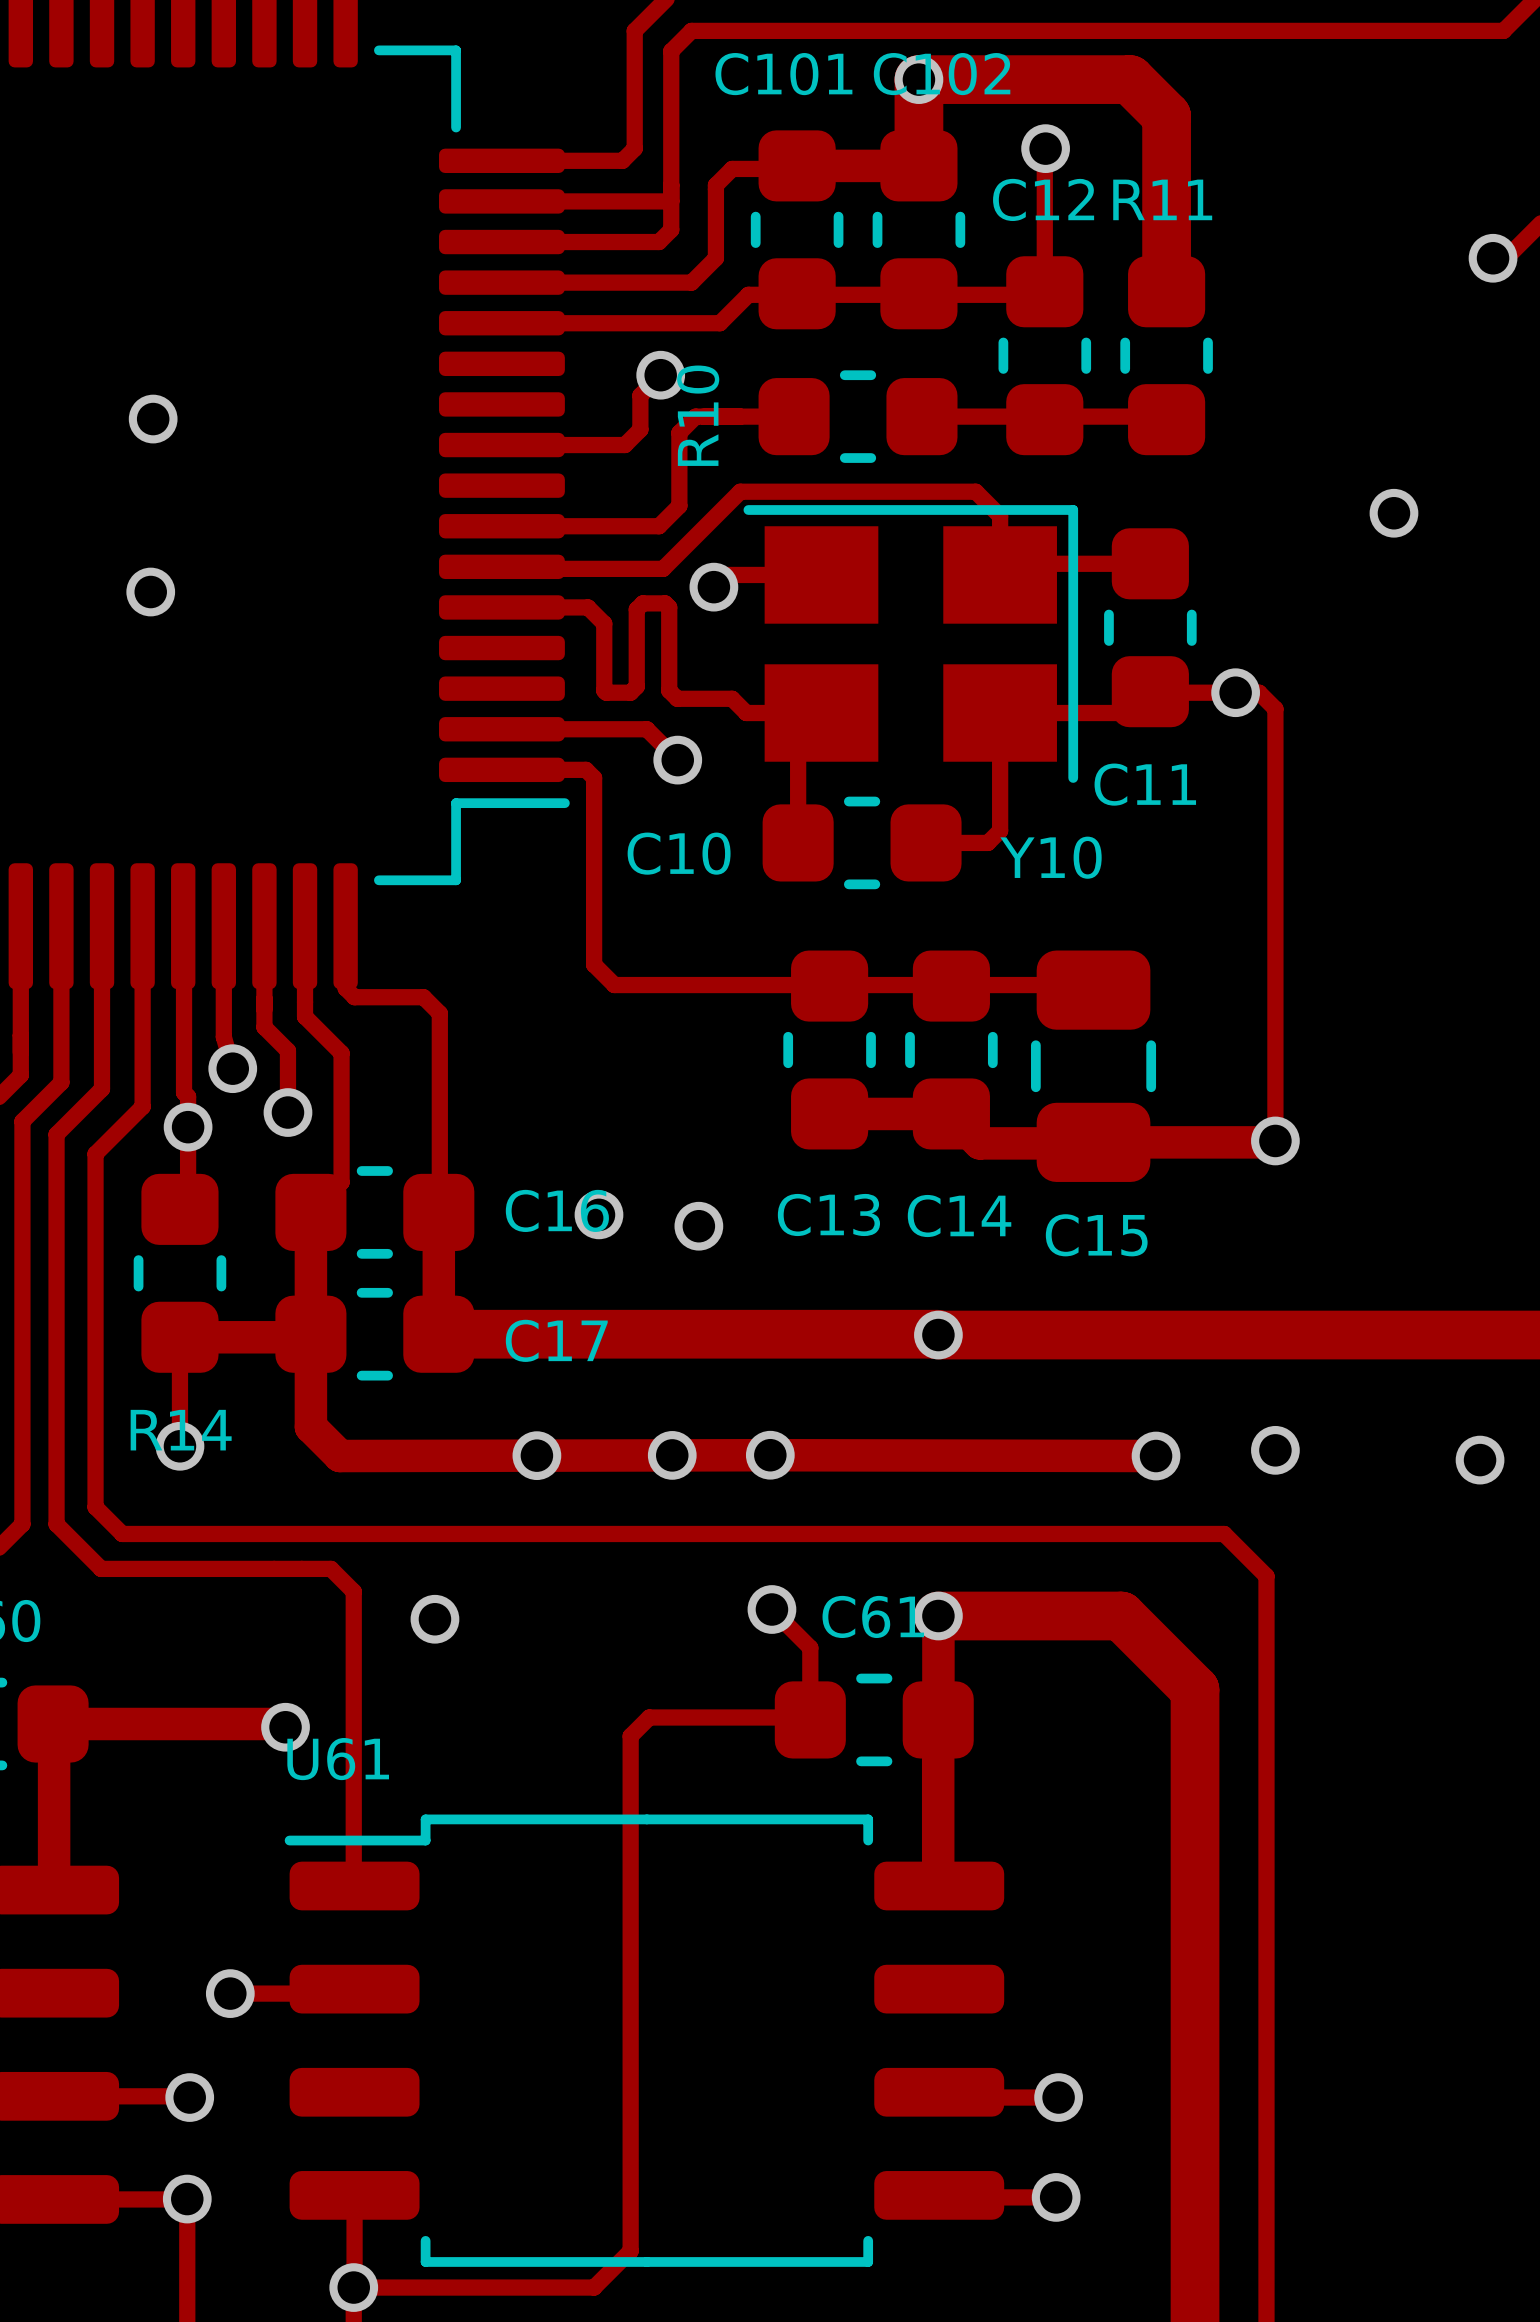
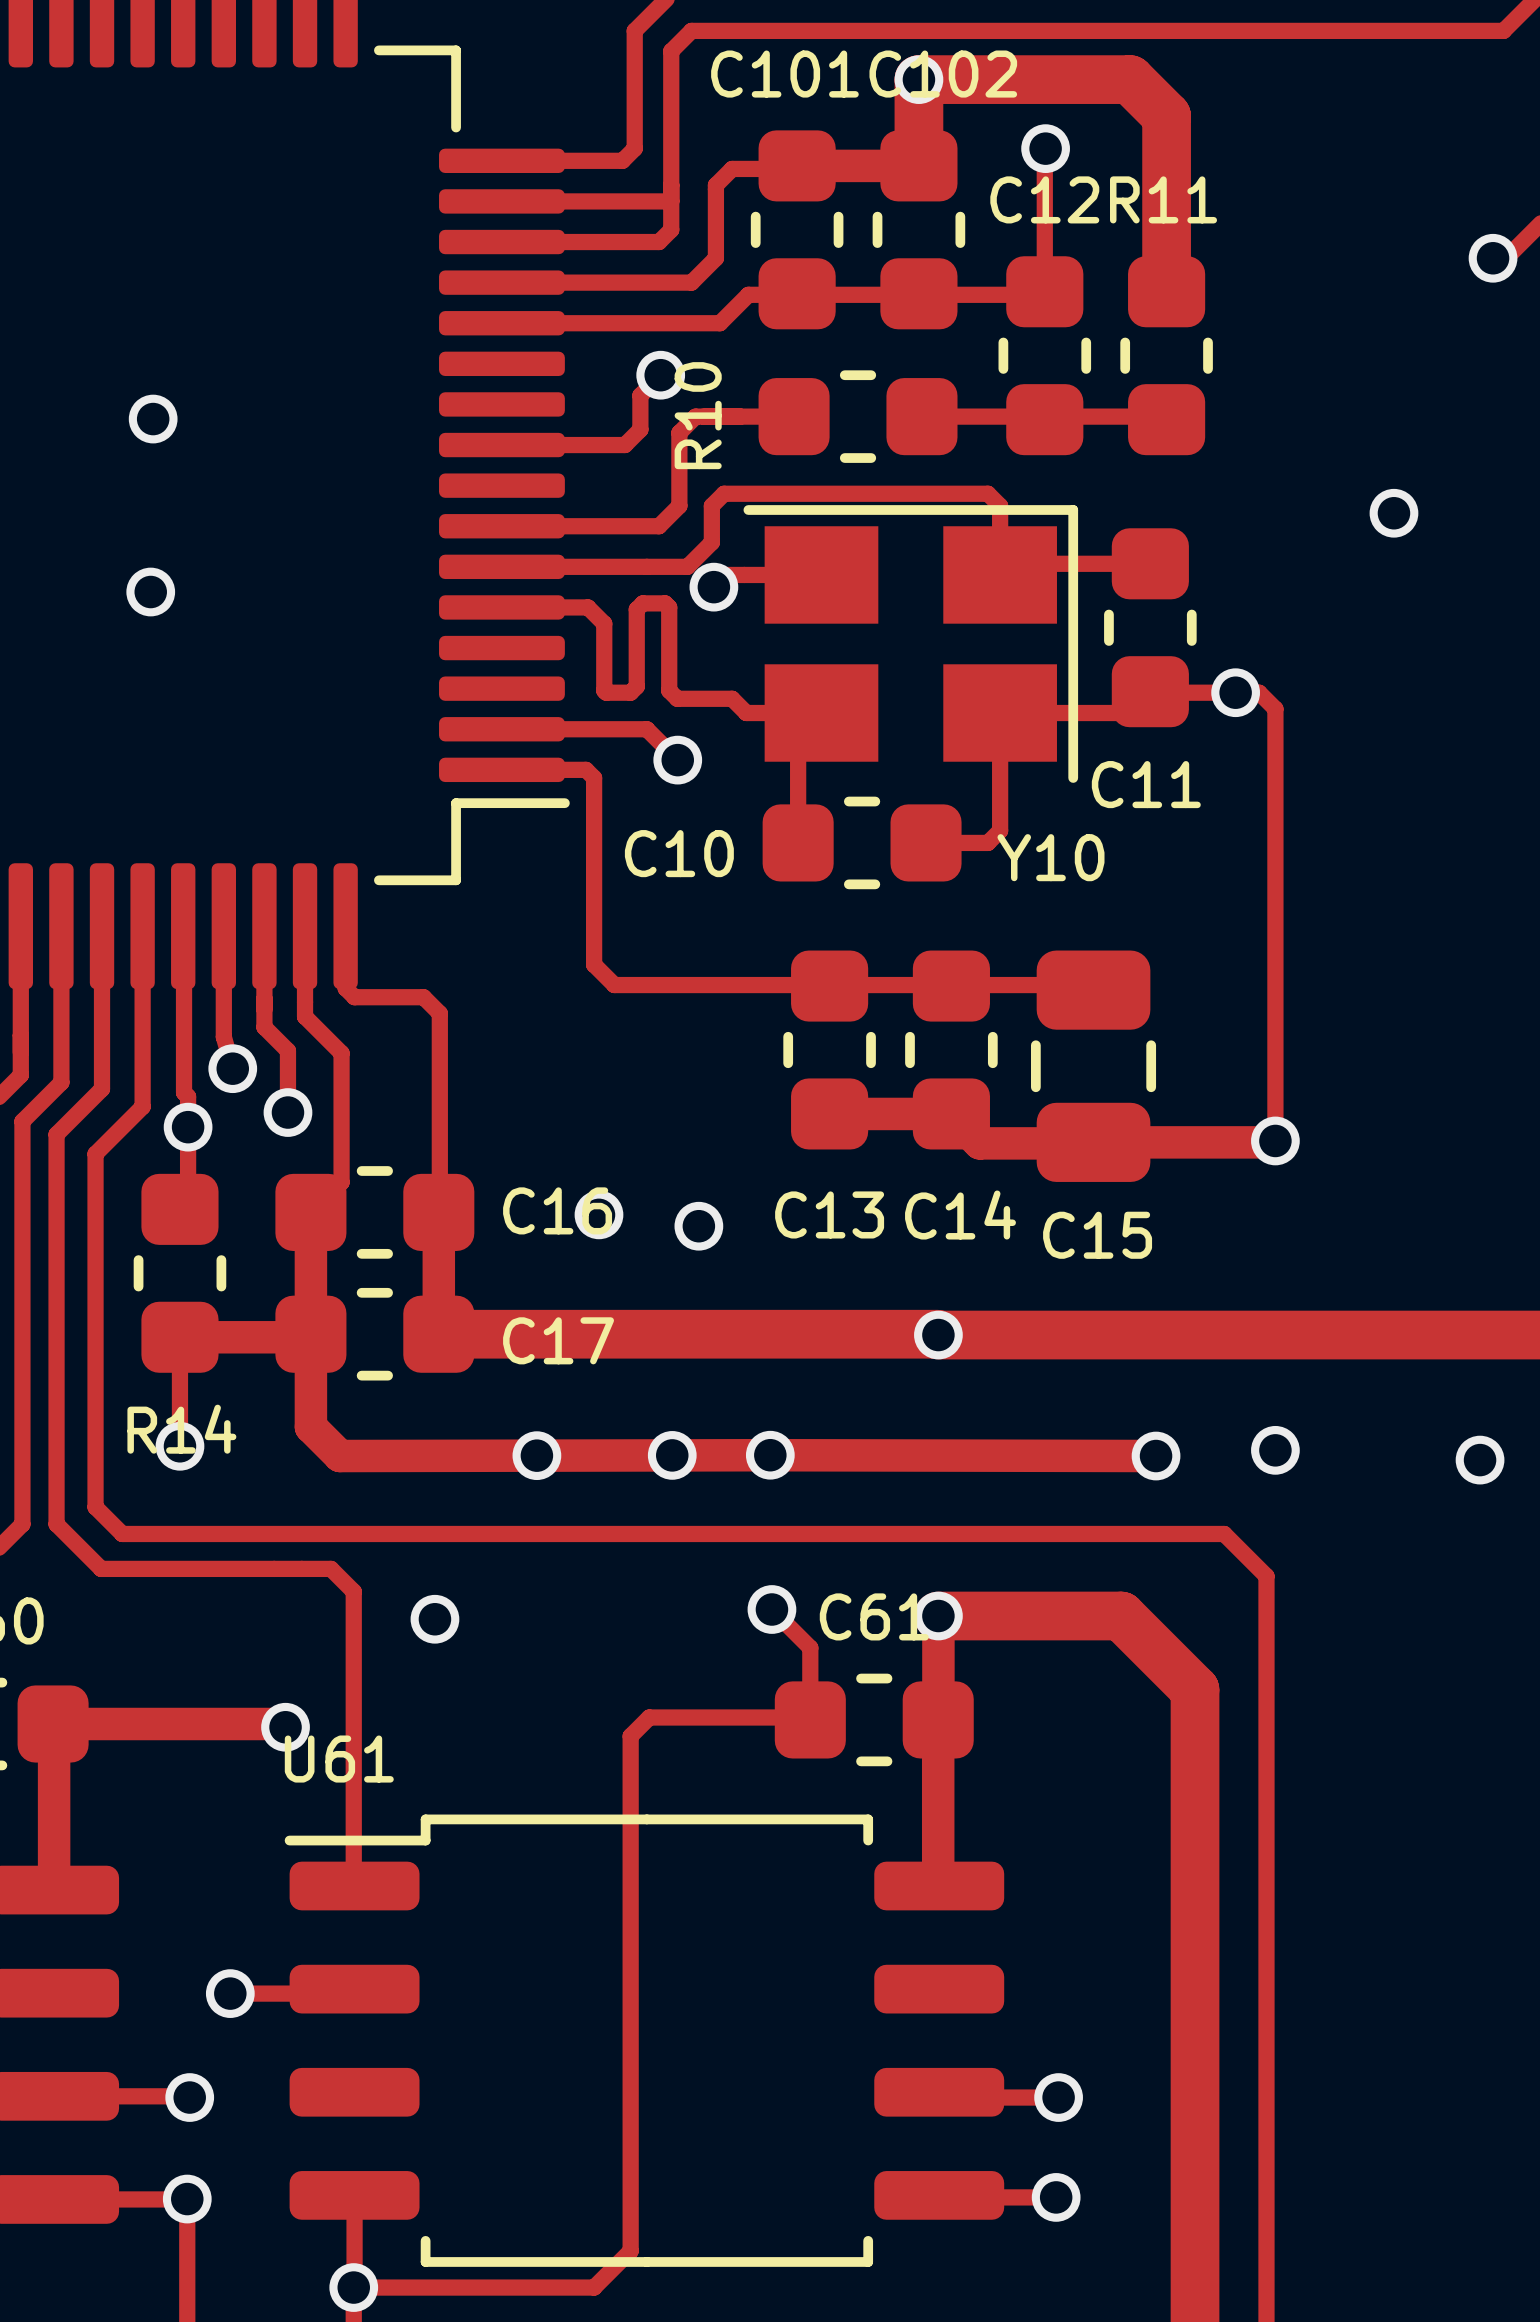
track: (1000, 516) (975, 491) (740, 491) (663, 568) (503, 568) (501, 566) -> (1000, 516) (1000, 505) (987, 493) (724, 493) (711, 505) (711, 542) (687, 566) (501, 566)

